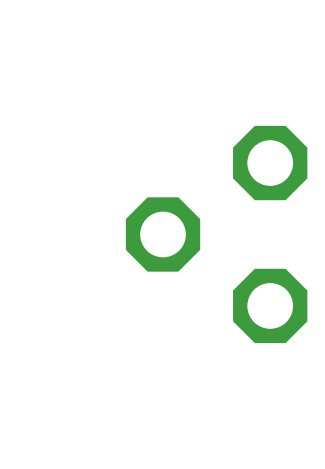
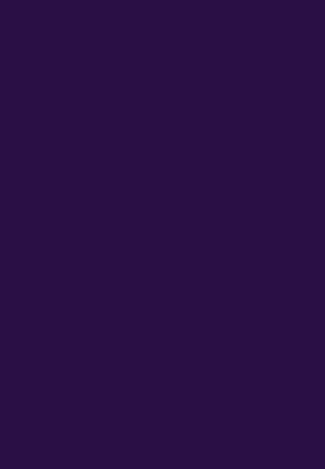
part: (216, 234) -> none

